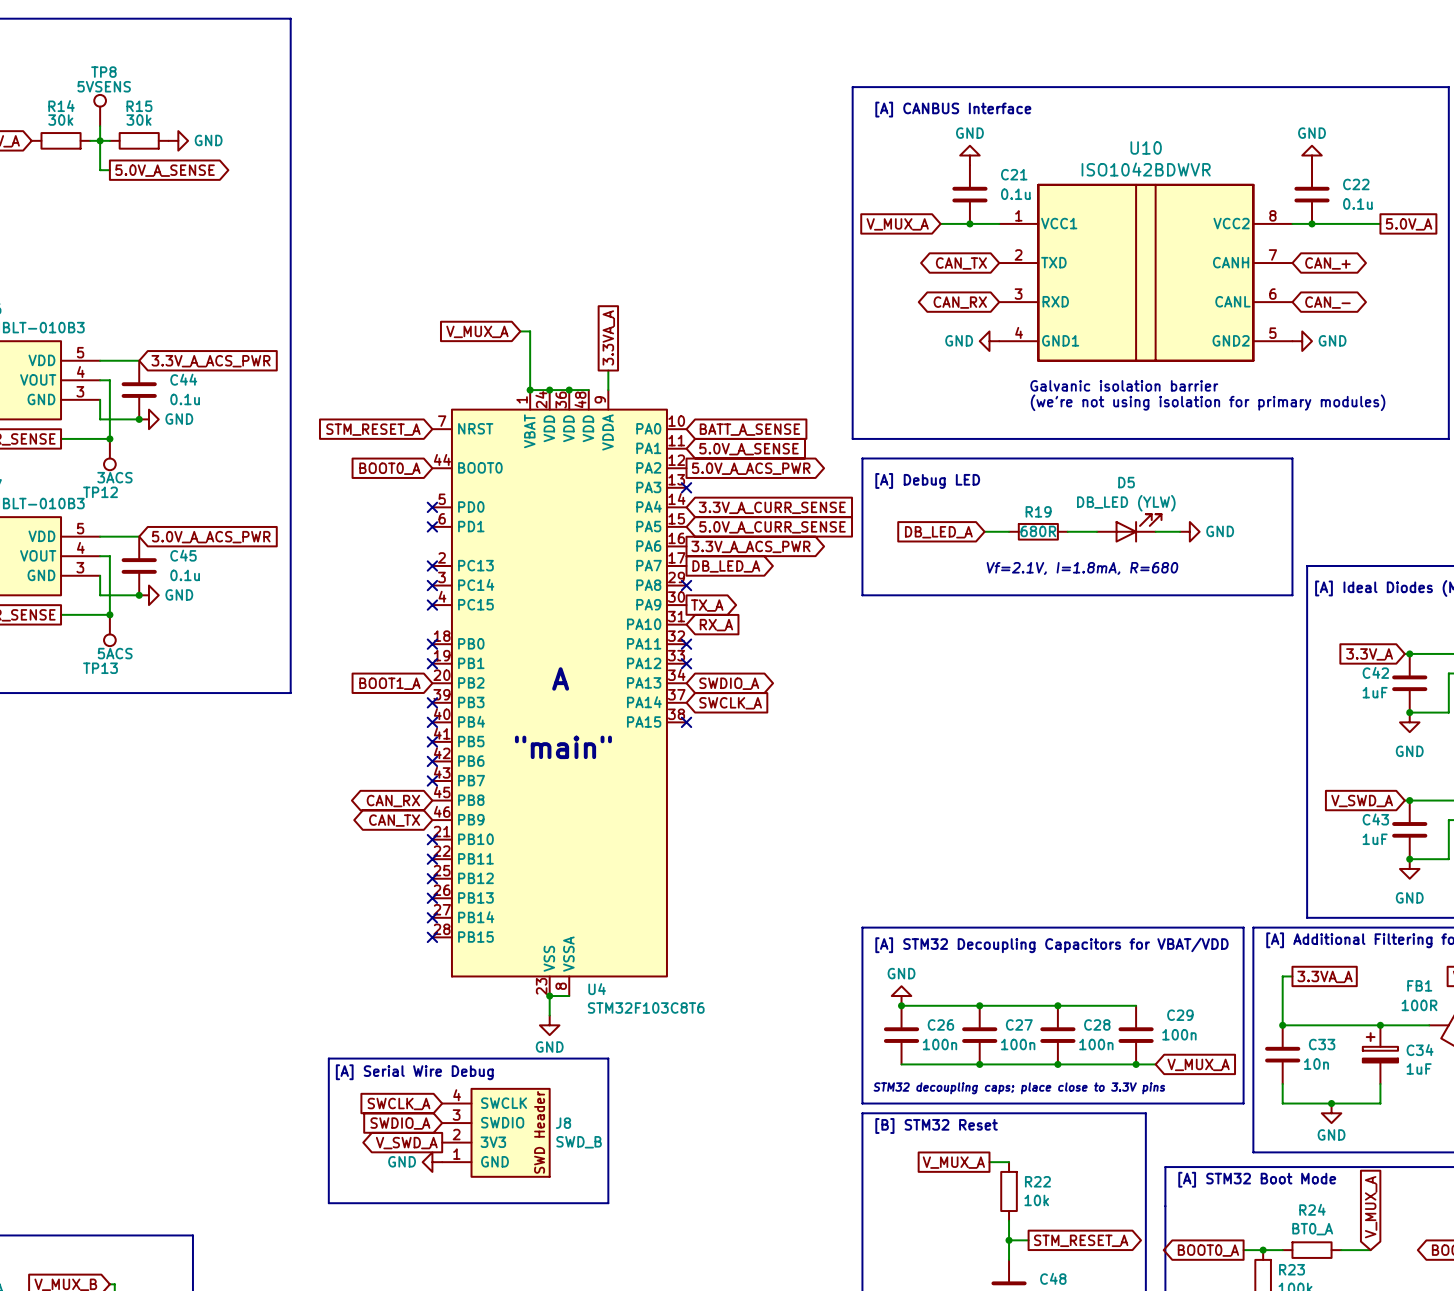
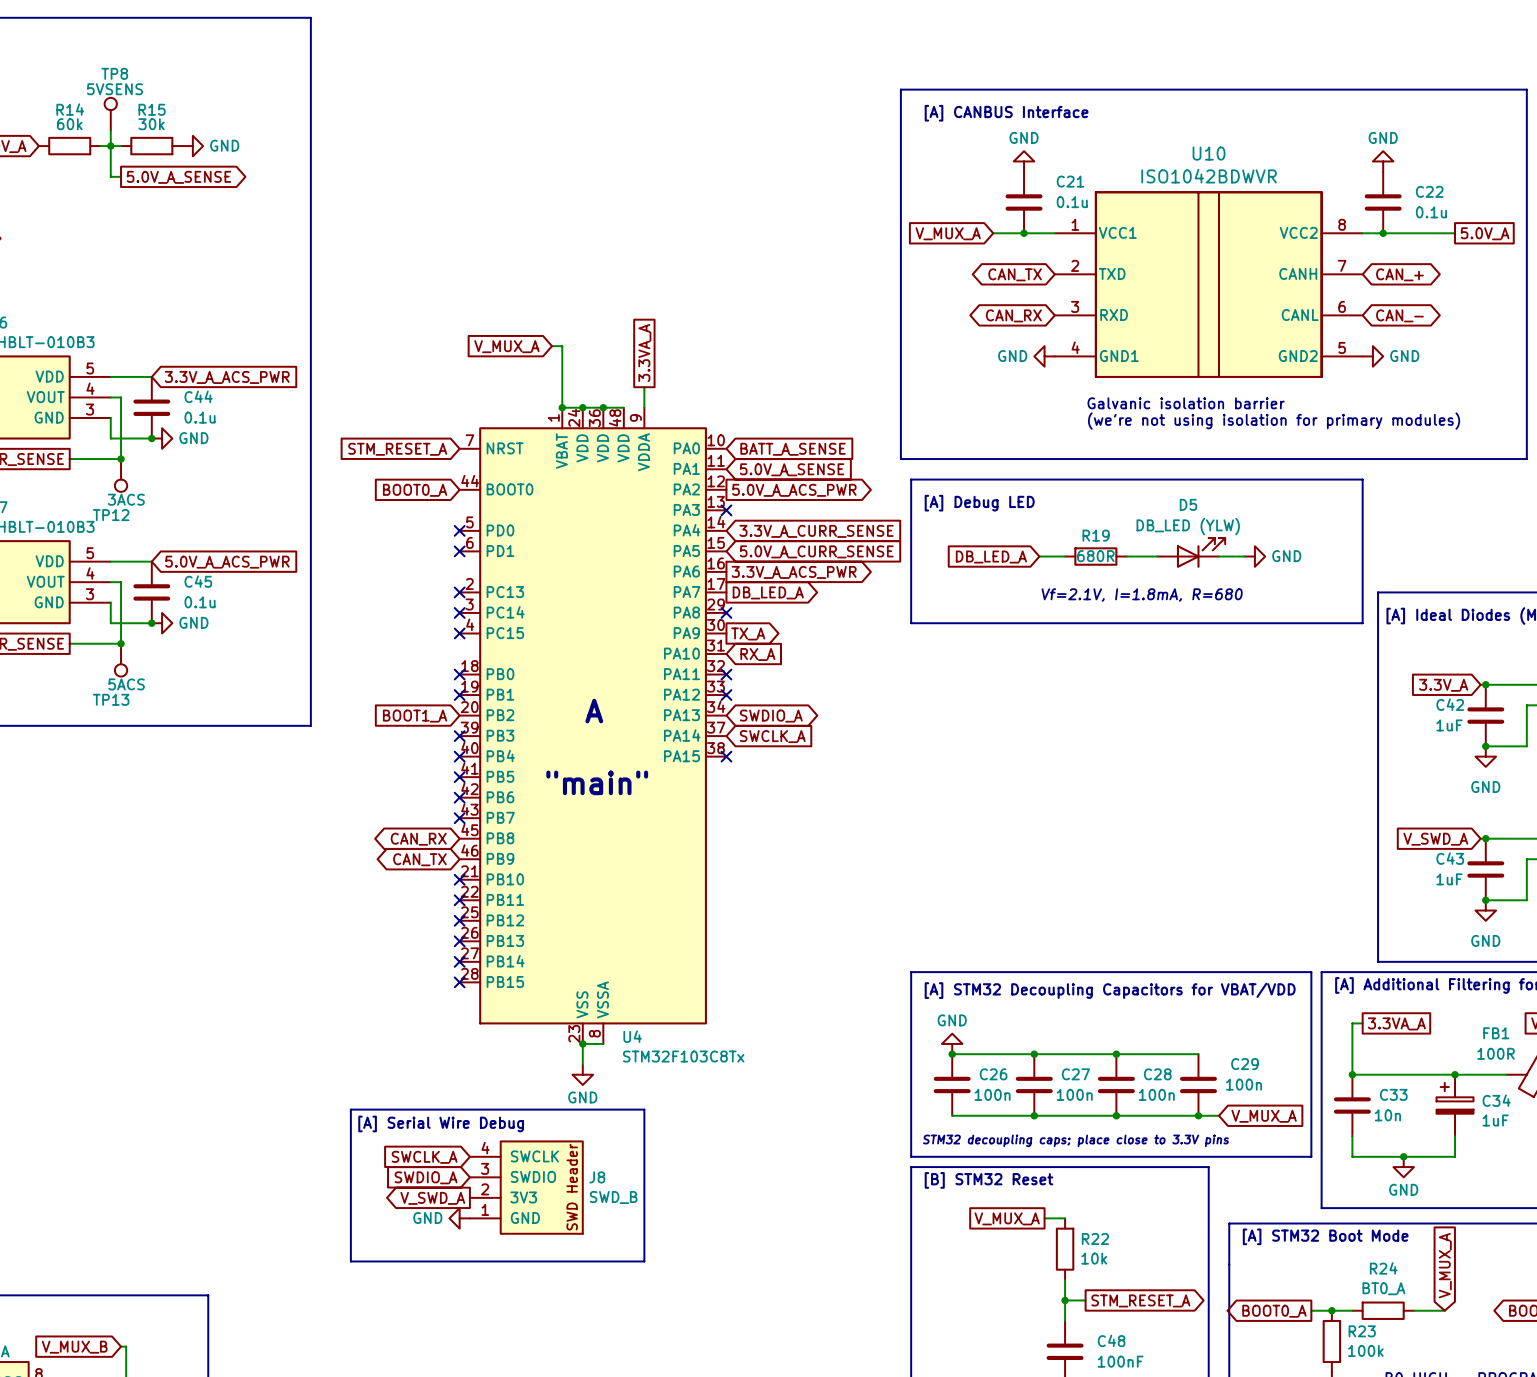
R14 value: 30k (60, 120) -> 60k (69, 124)
U4 value: STM32F103C8T6 (646, 1007) -> STM32F103C8Tx (683, 1056)

